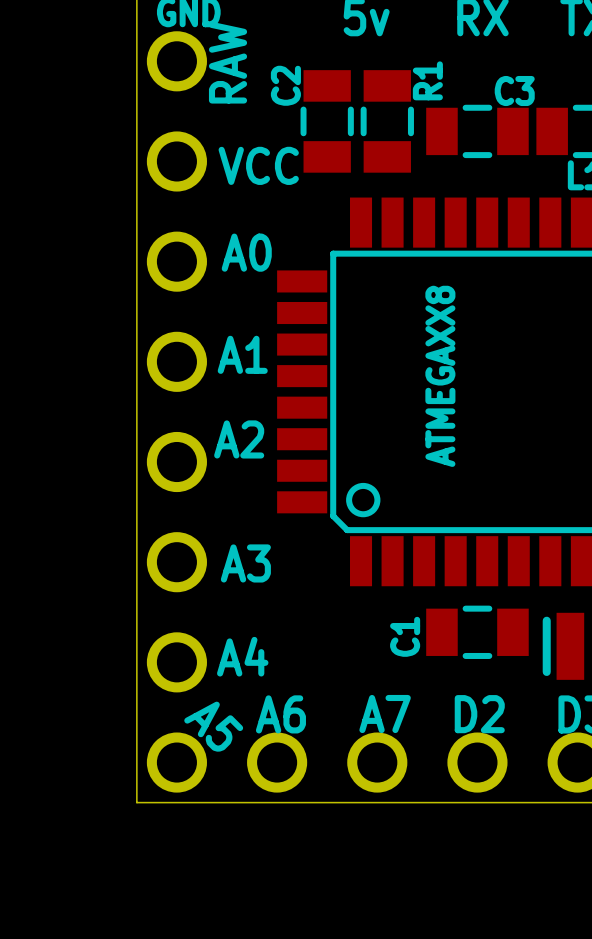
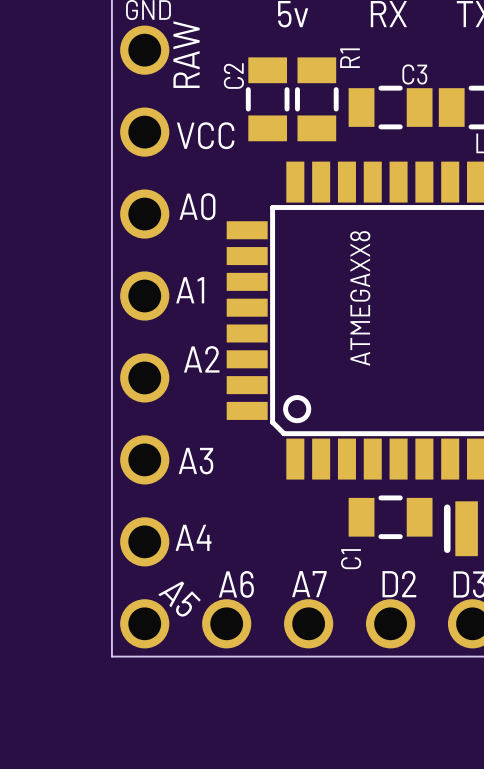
C1 name position: C1 (405, 636) -> C1 (351, 559)

